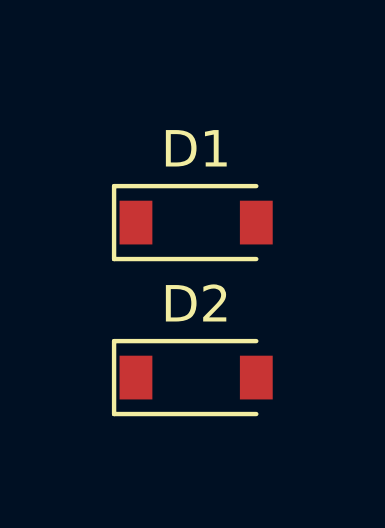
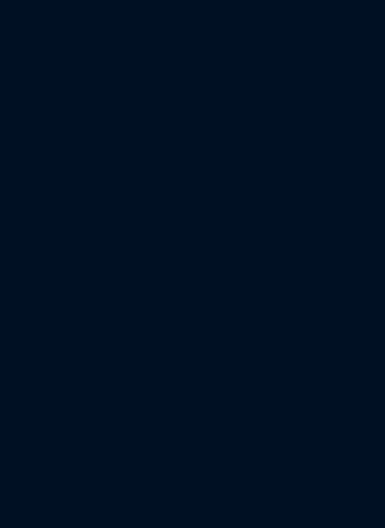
D1: (192, 222) -> none
D2: (192, 377) -> none

